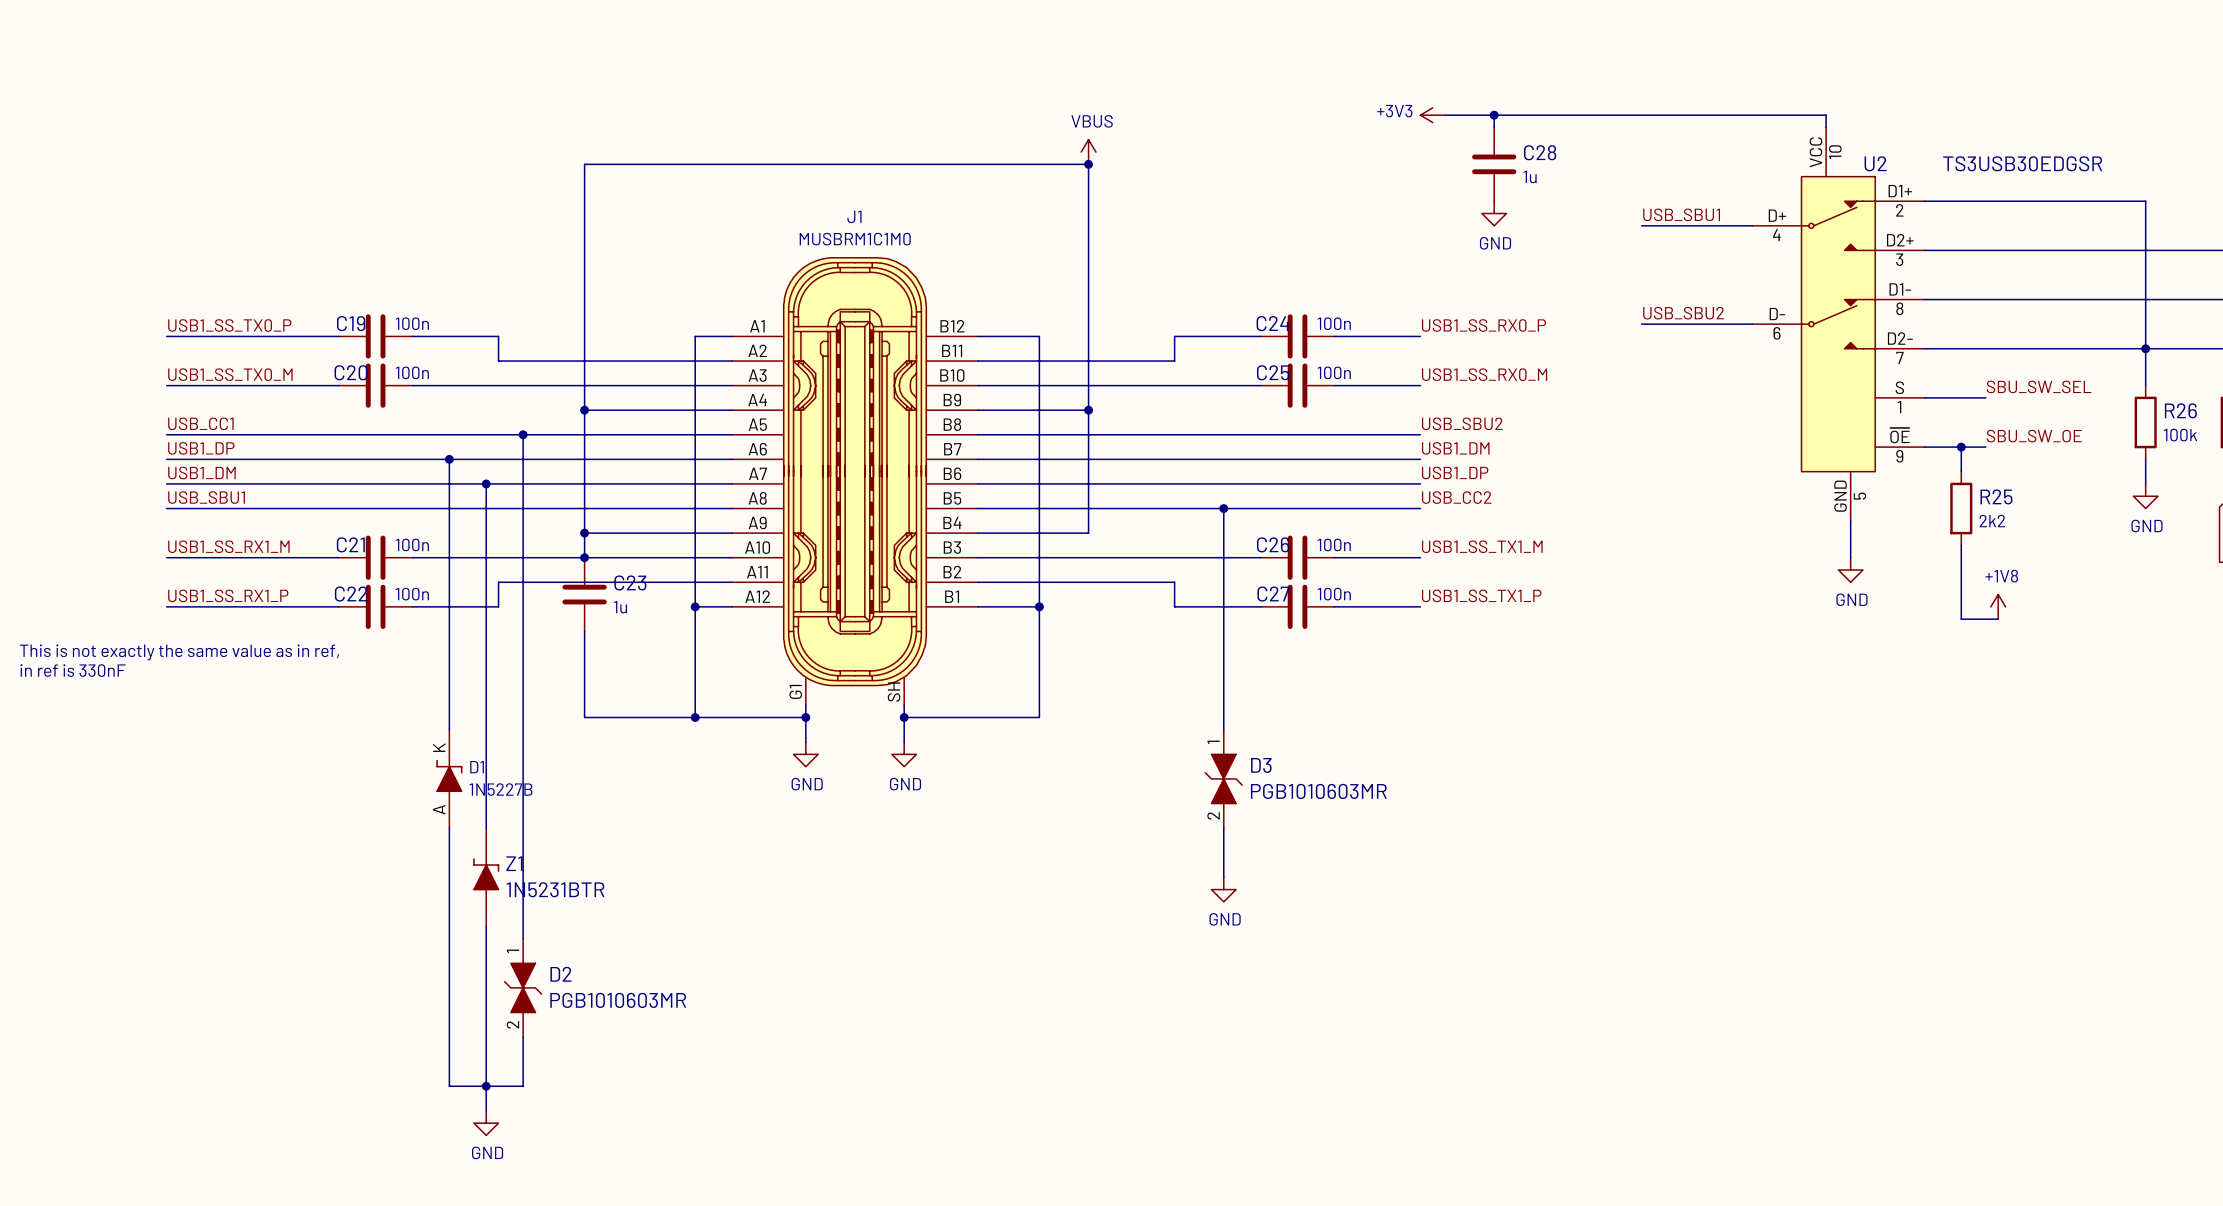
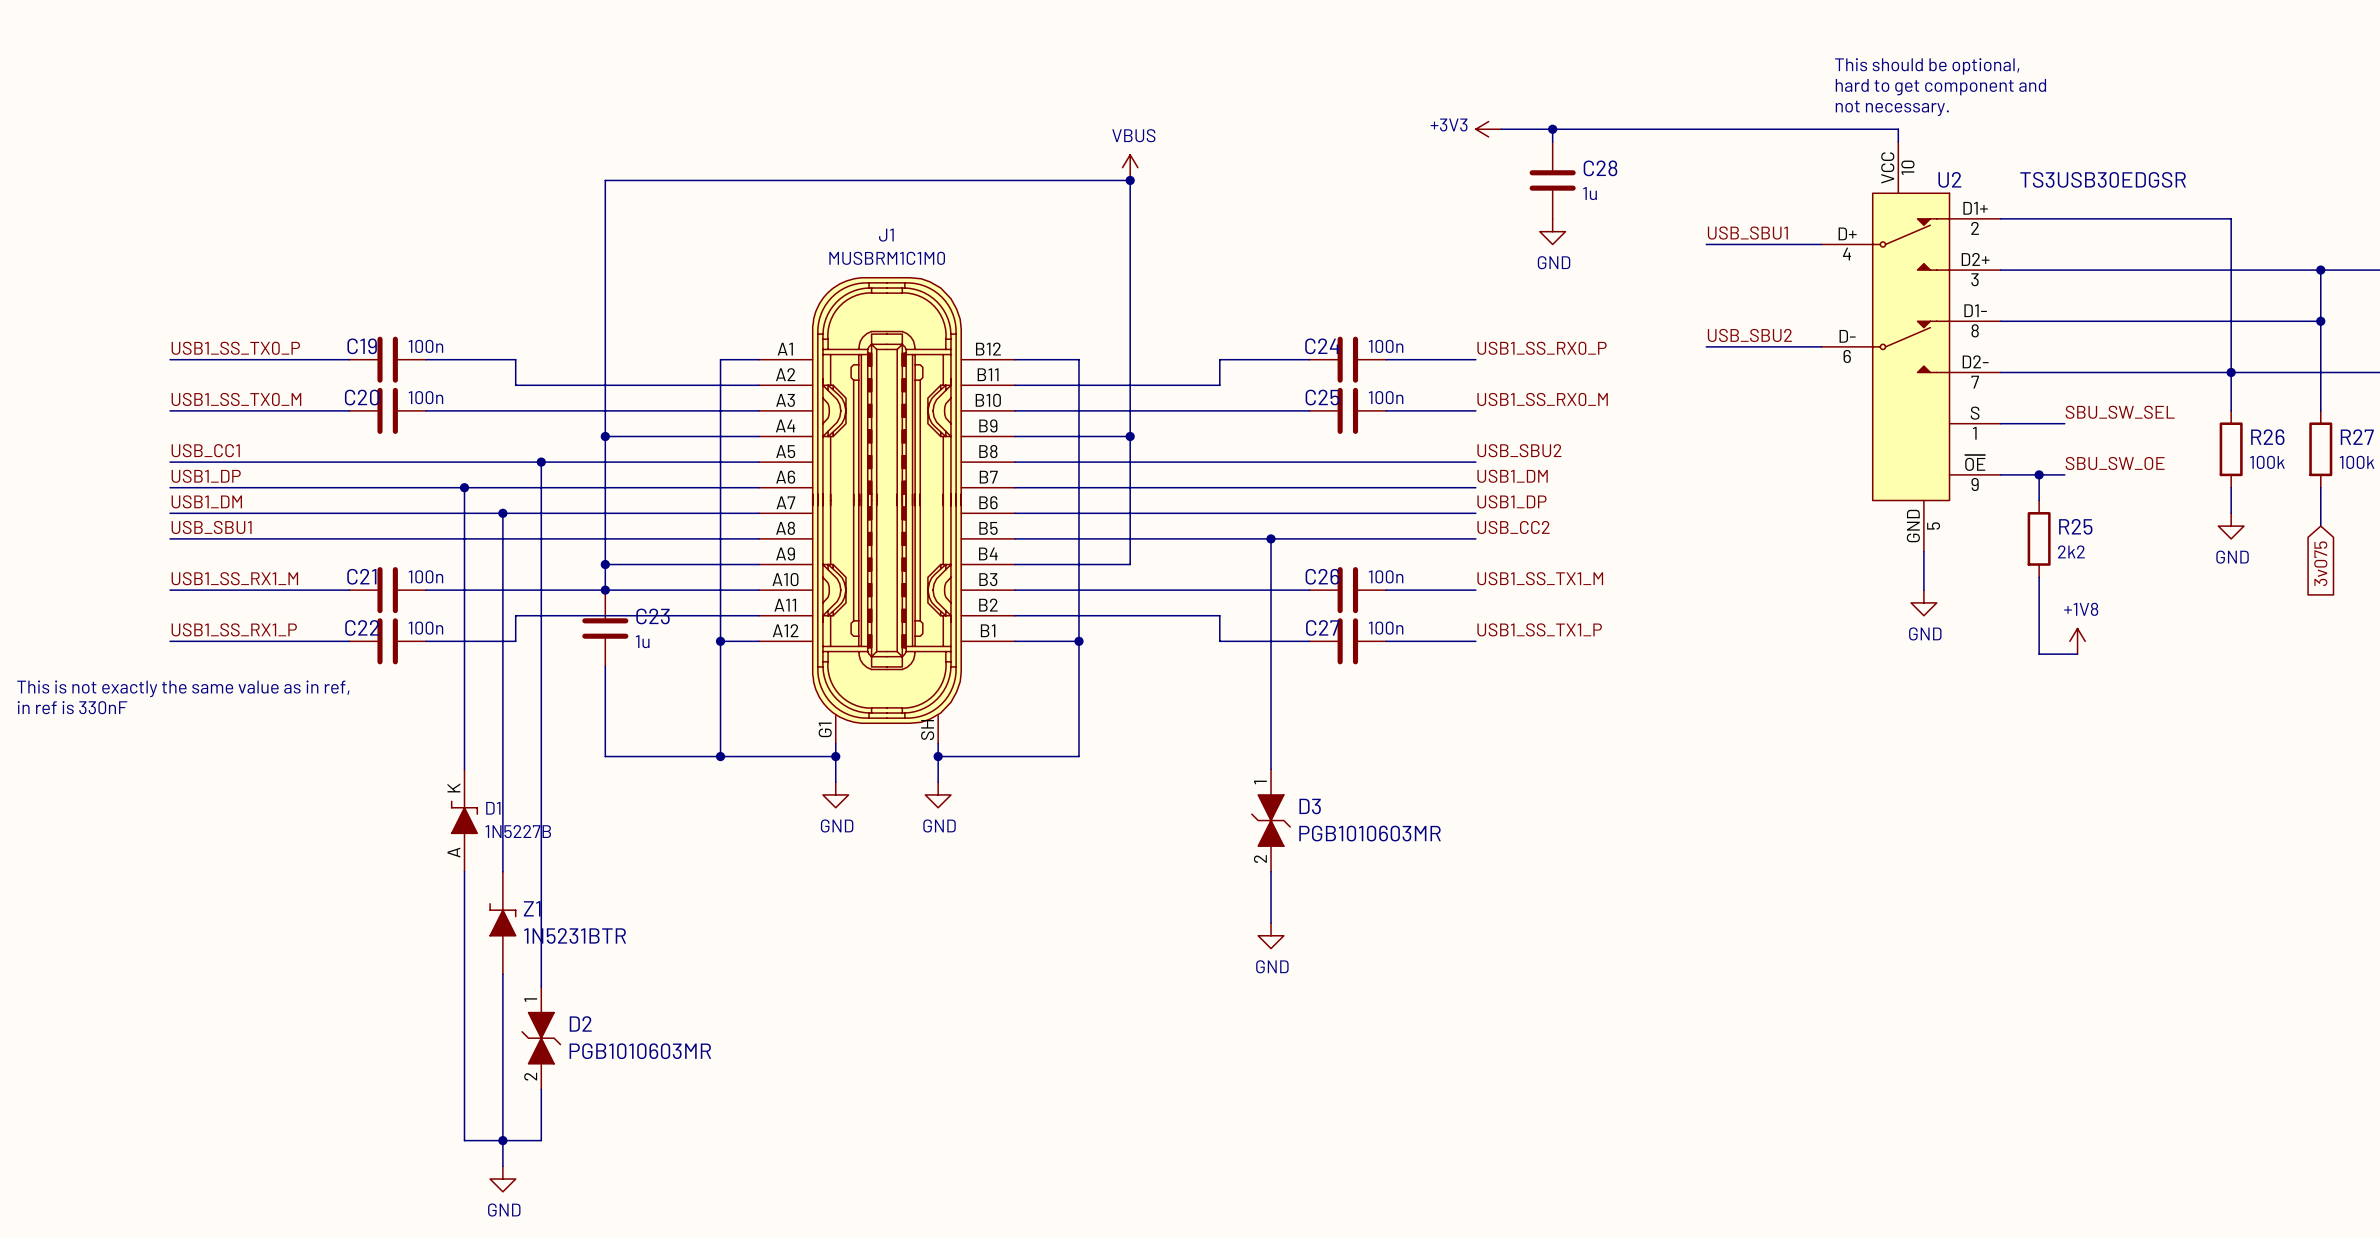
text: none -> This should be optional, (1927, 66)
text: none -> hard to get component and (1940, 87)
text: none -> not necessary. (1892, 108)

